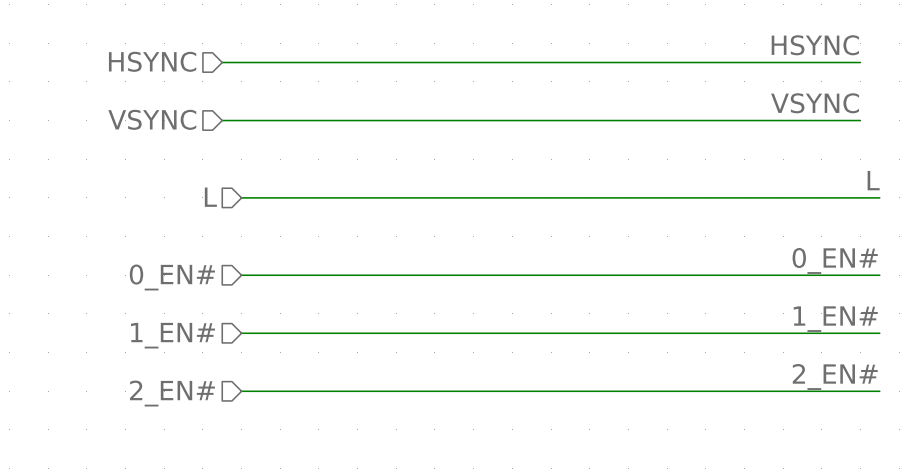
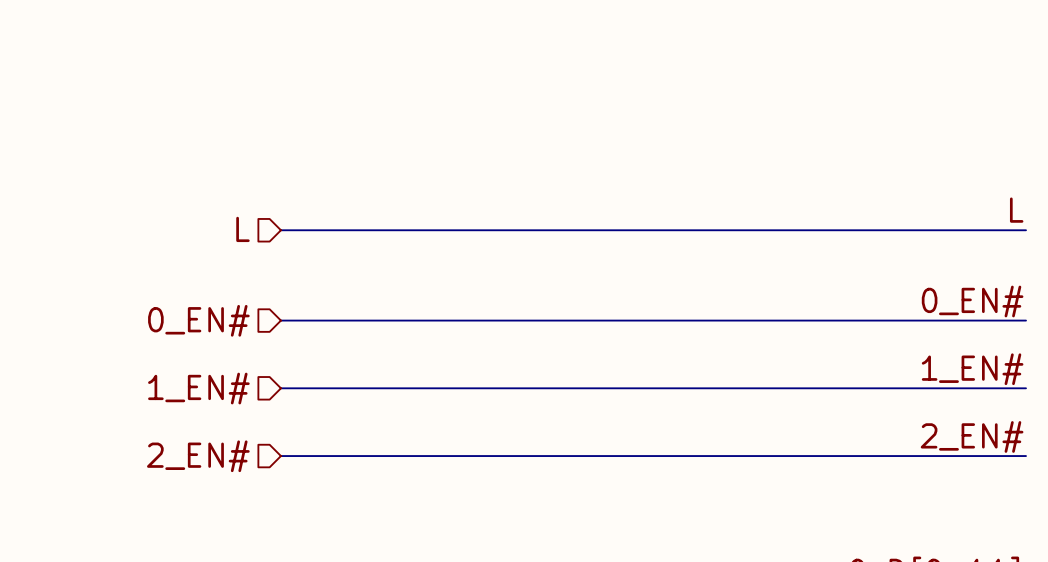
label: HSYNC (815, 45) -> none
hierarchical label: HSYNC (152, 61) -> none
wire: (222, 62) (860, 62) -> none
label: VSYNC (815, 103) -> none
hierarchical label: VSYNC (152, 119) -> none
wire: (222, 120) (860, 120) -> none

